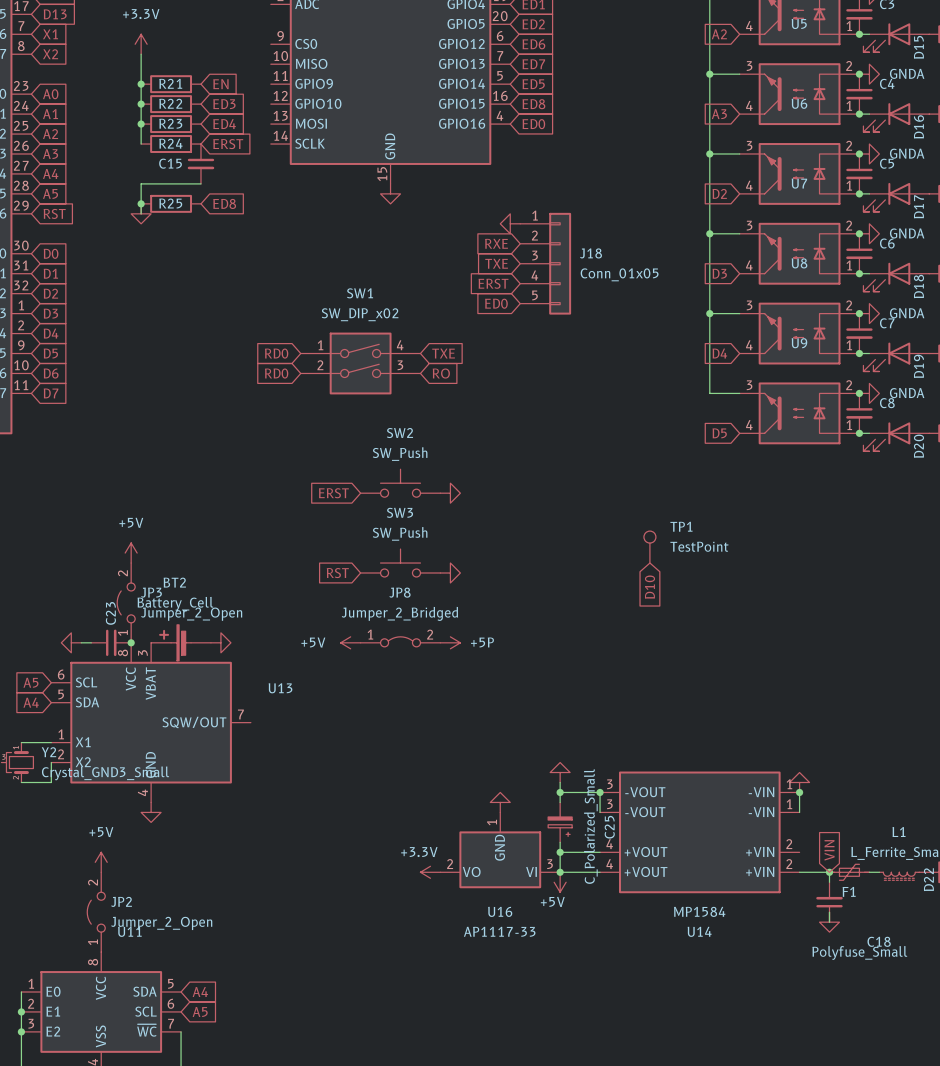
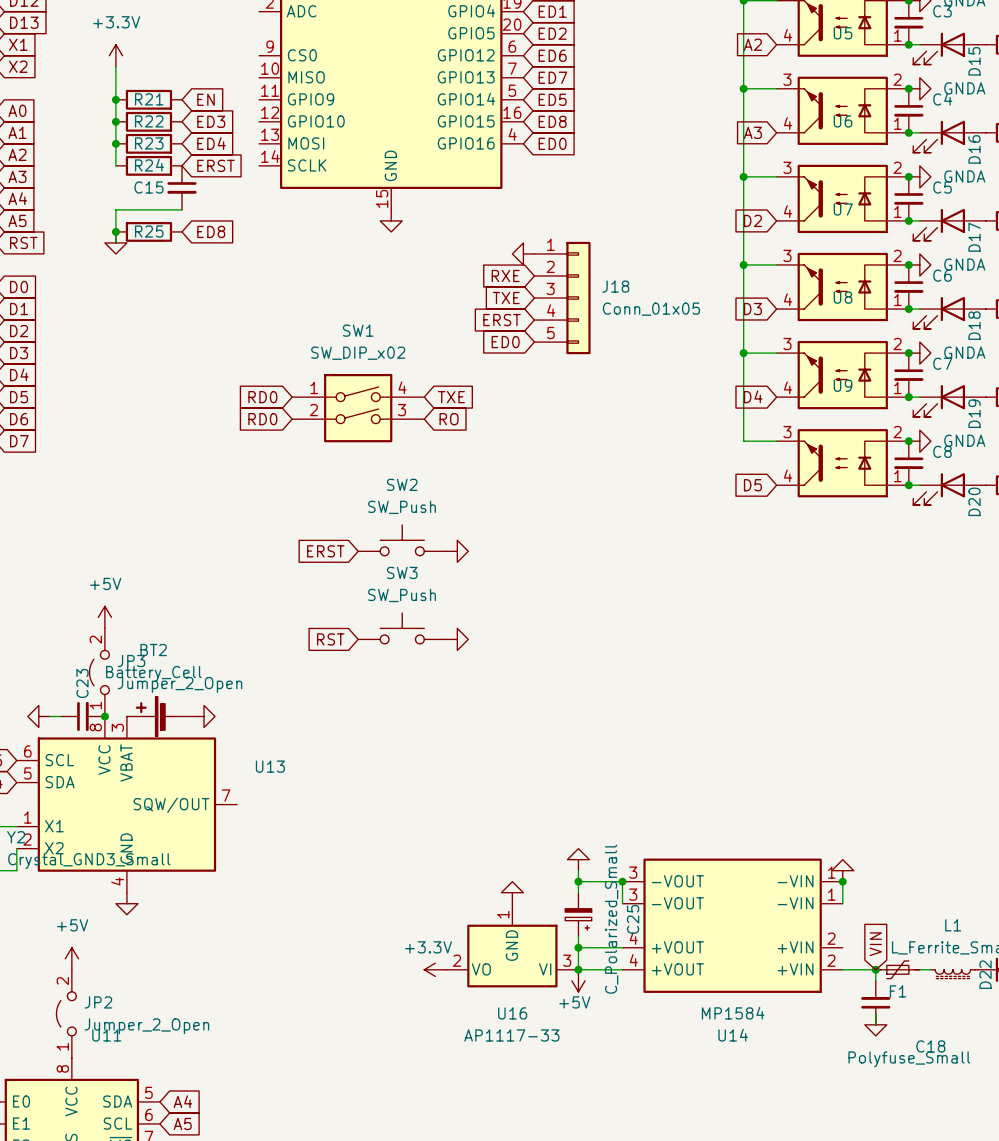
TP1: TestPoint (649, 547) -> none
global label: D10 (649, 587) -> none
JP8: Jumper_2_Bridged (400, 641) -> none
power symbol: +5V (350, 642) -> none
power symbol: +5P (450, 642) -> none

